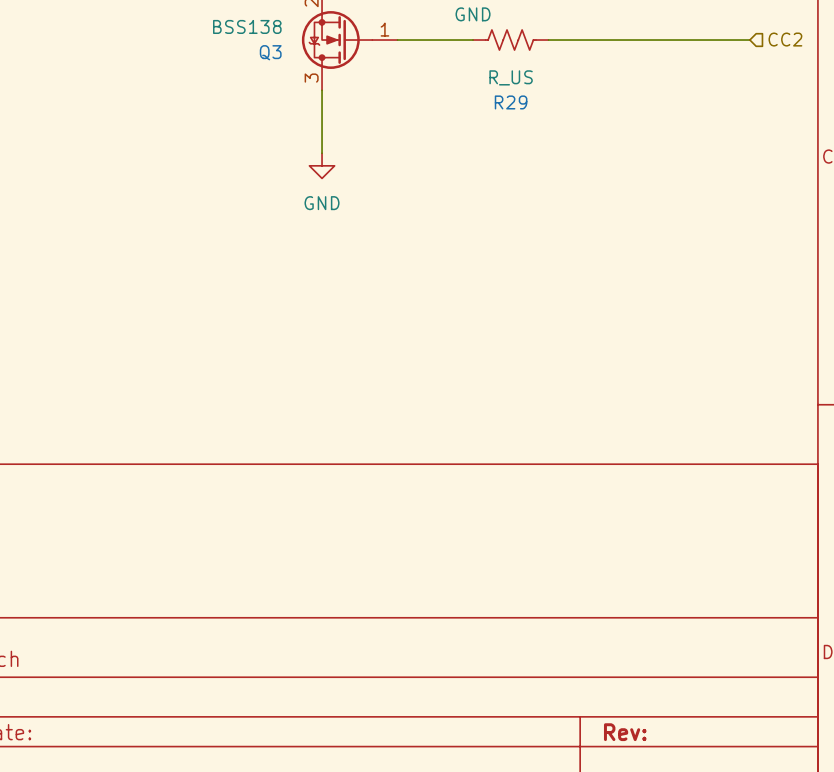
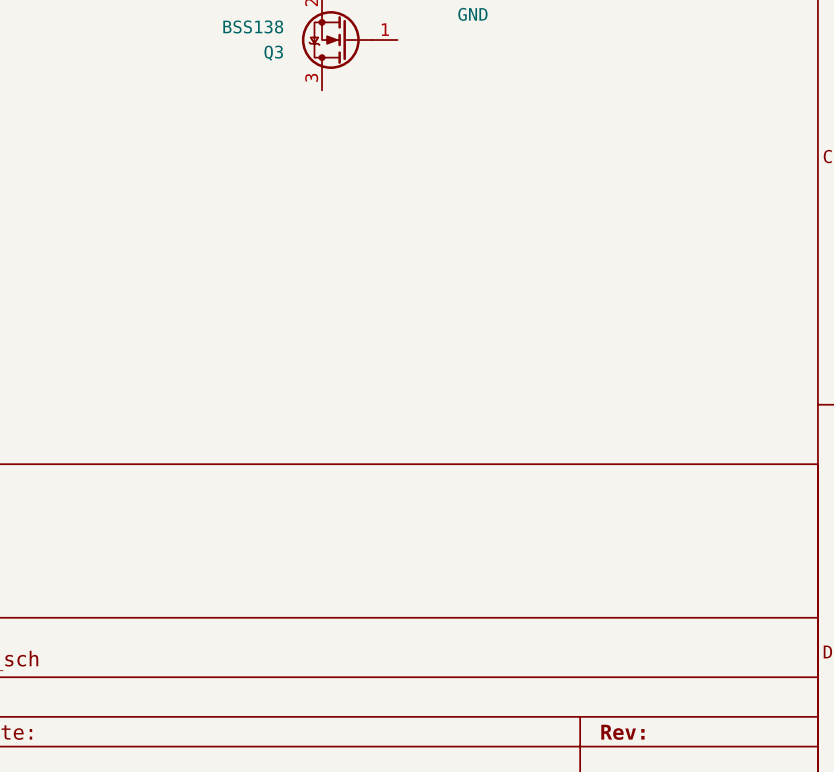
hierarchical label: CC2 (785, 39) -> none
wire: (397, 40) (473, 40) -> none
R29: R_US (510, 40) -> none
wire: (548, 40) (749, 40) -> none
wire: (322, 90) (322, 153) -> none
power symbol: GND (322, 165) -> none

